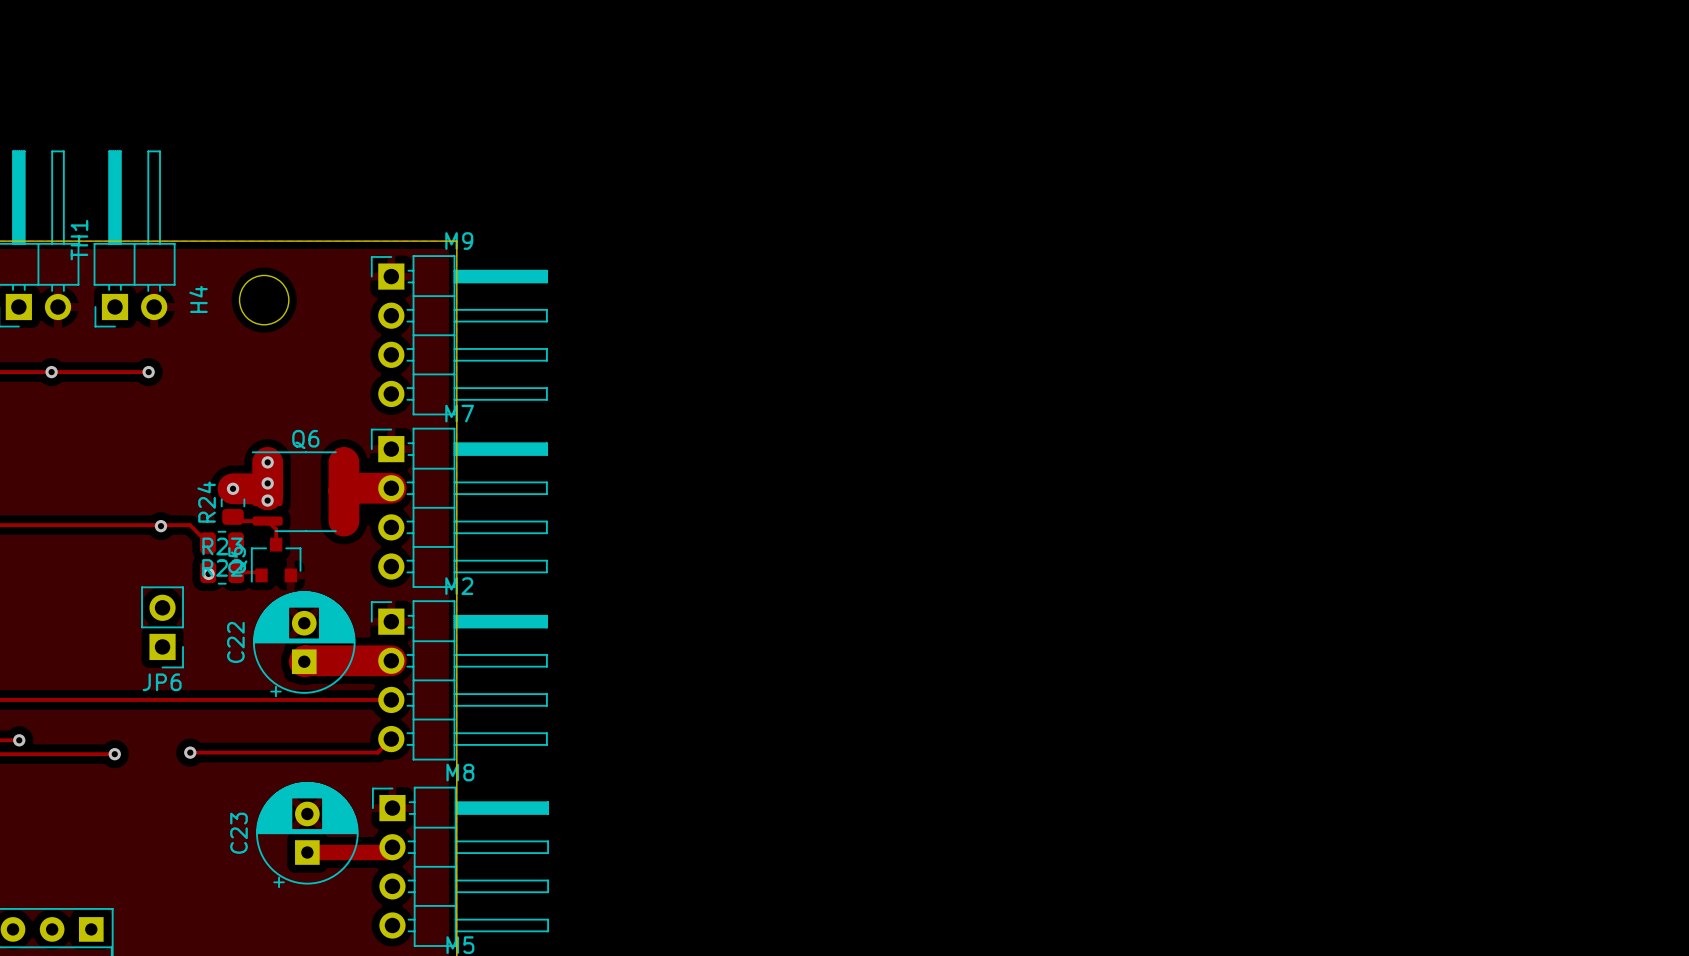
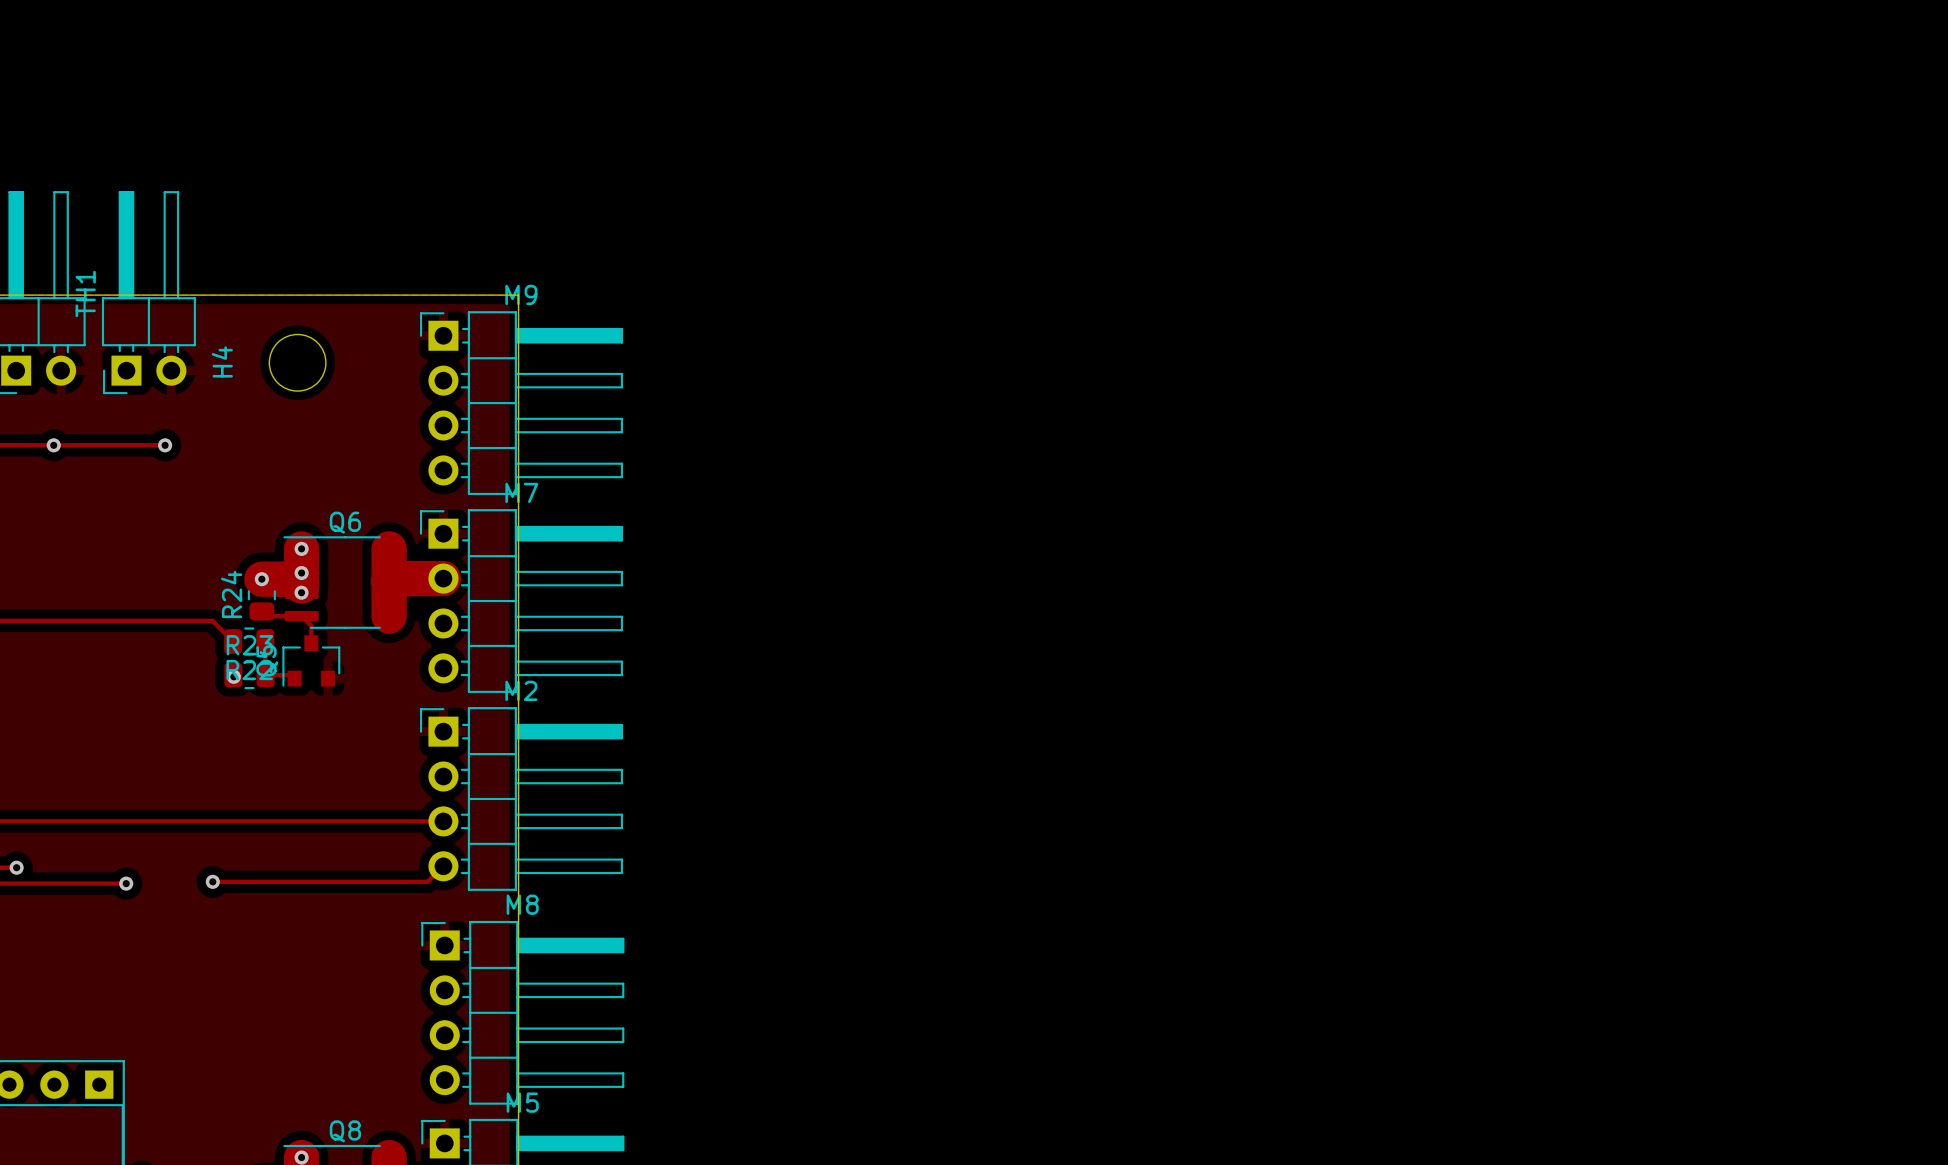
via: (160, 526) -> none
JP6: (162, 627) -> none
C22: (304, 644) -> none
track: (391, 660) (304, 661) -> none
C23: (307, 835) -> none
track: (392, 847) (387, 852) (307, 852) -> none

